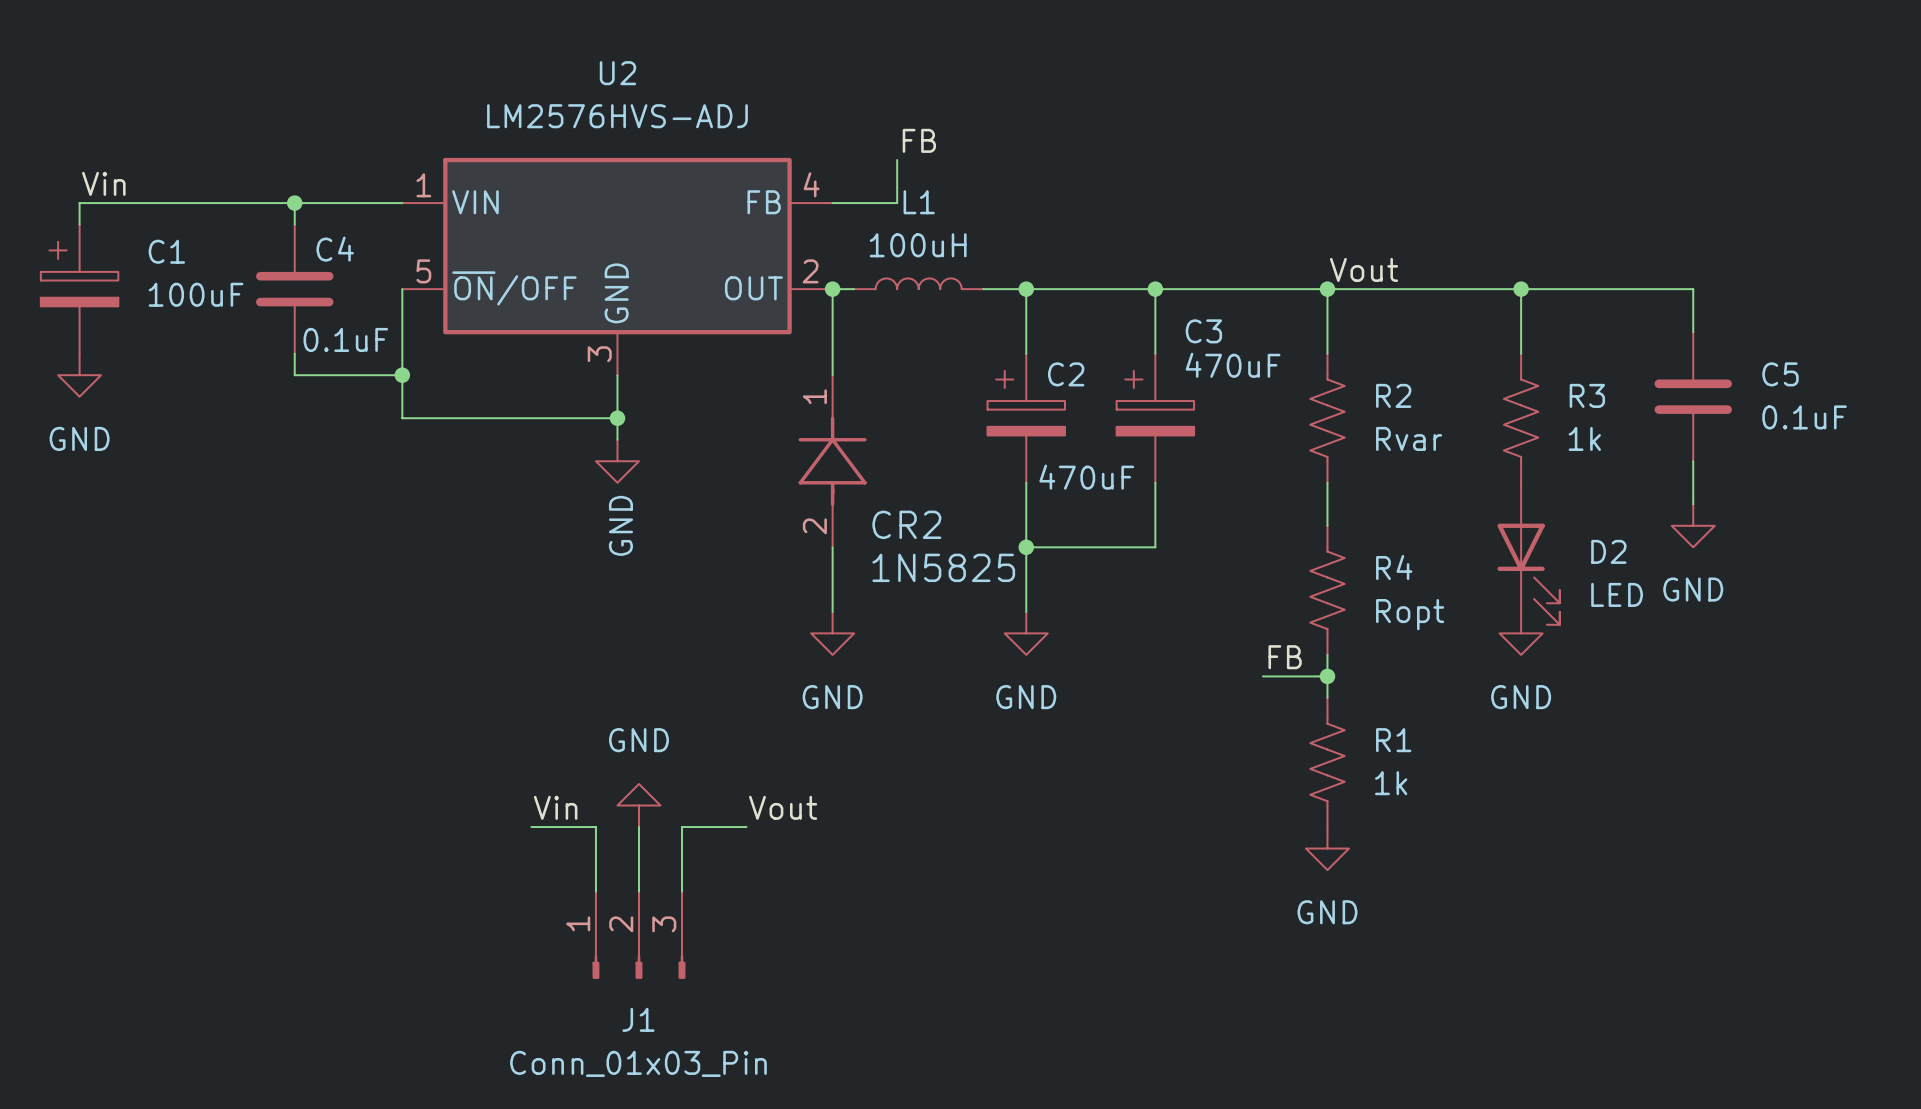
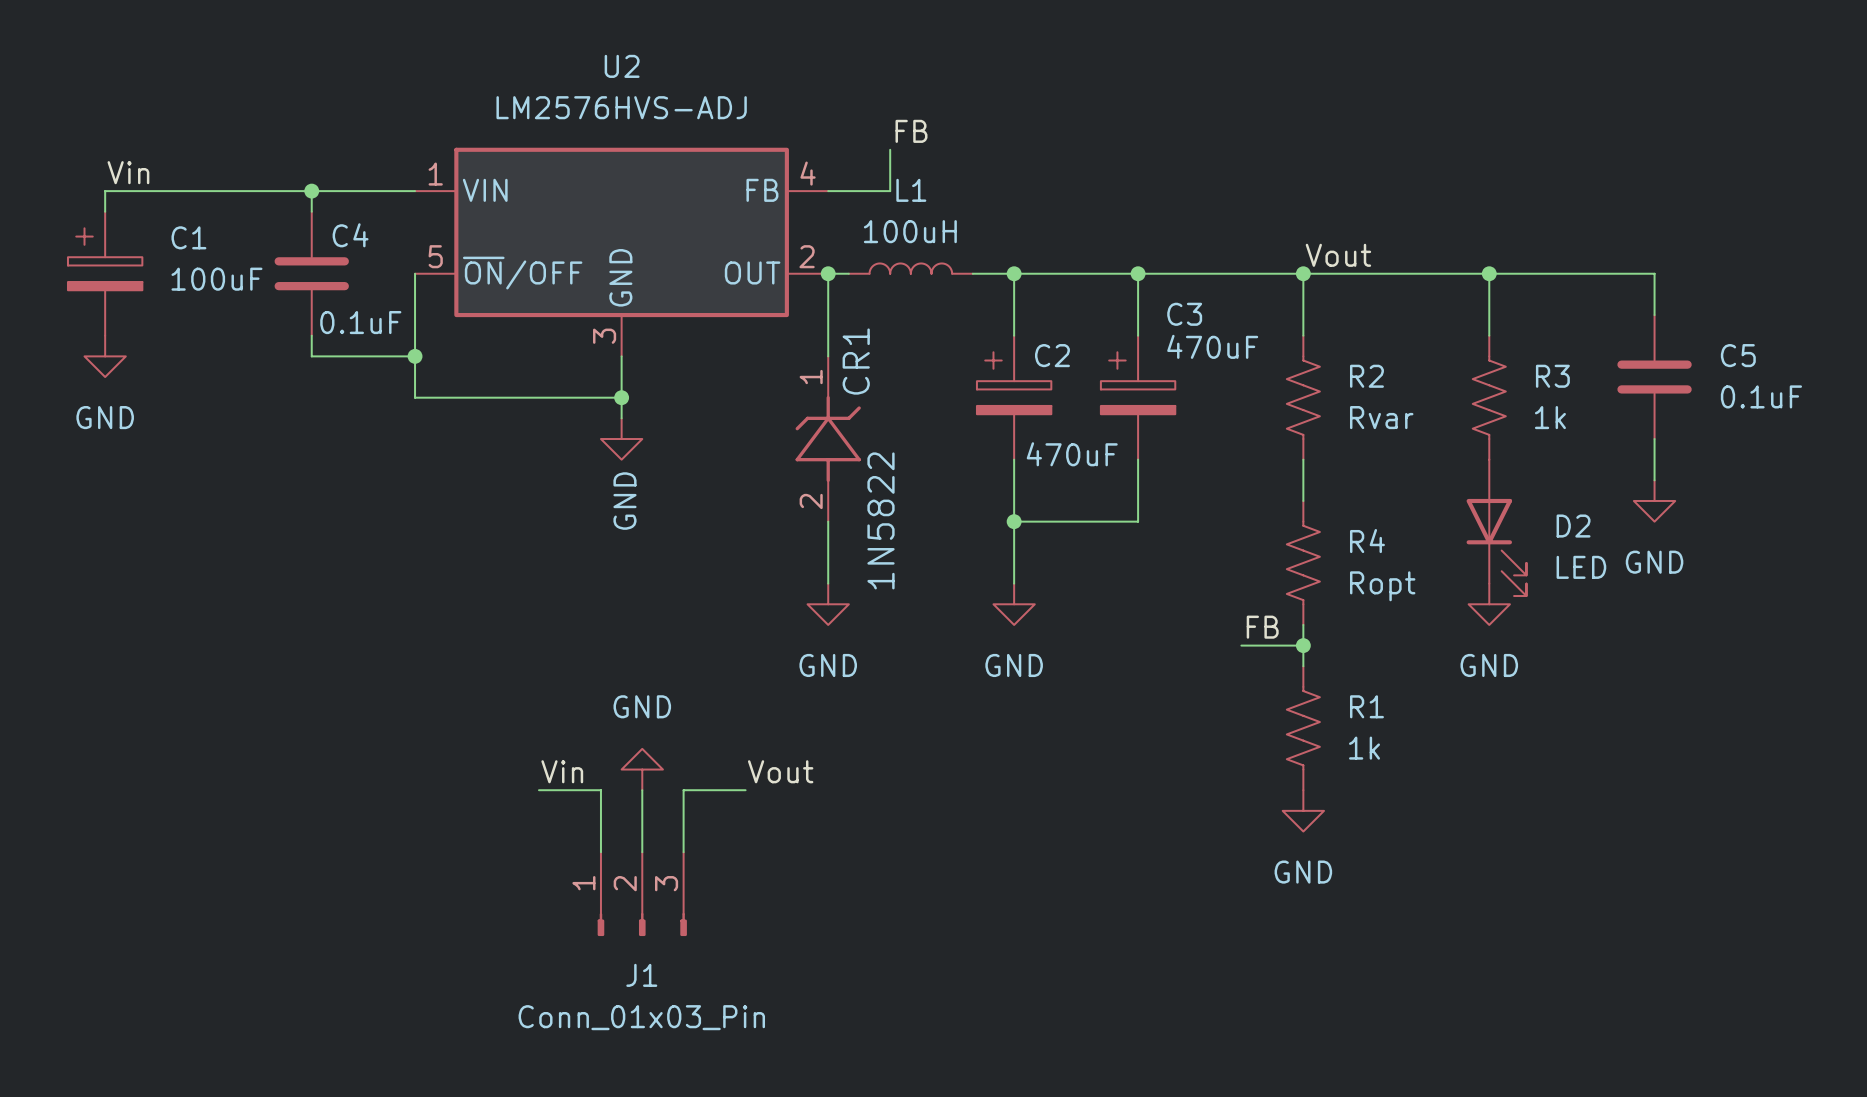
CR2: 1N5825 (832, 461) -> none
CR1: none -> 1N5822 (828, 439)

